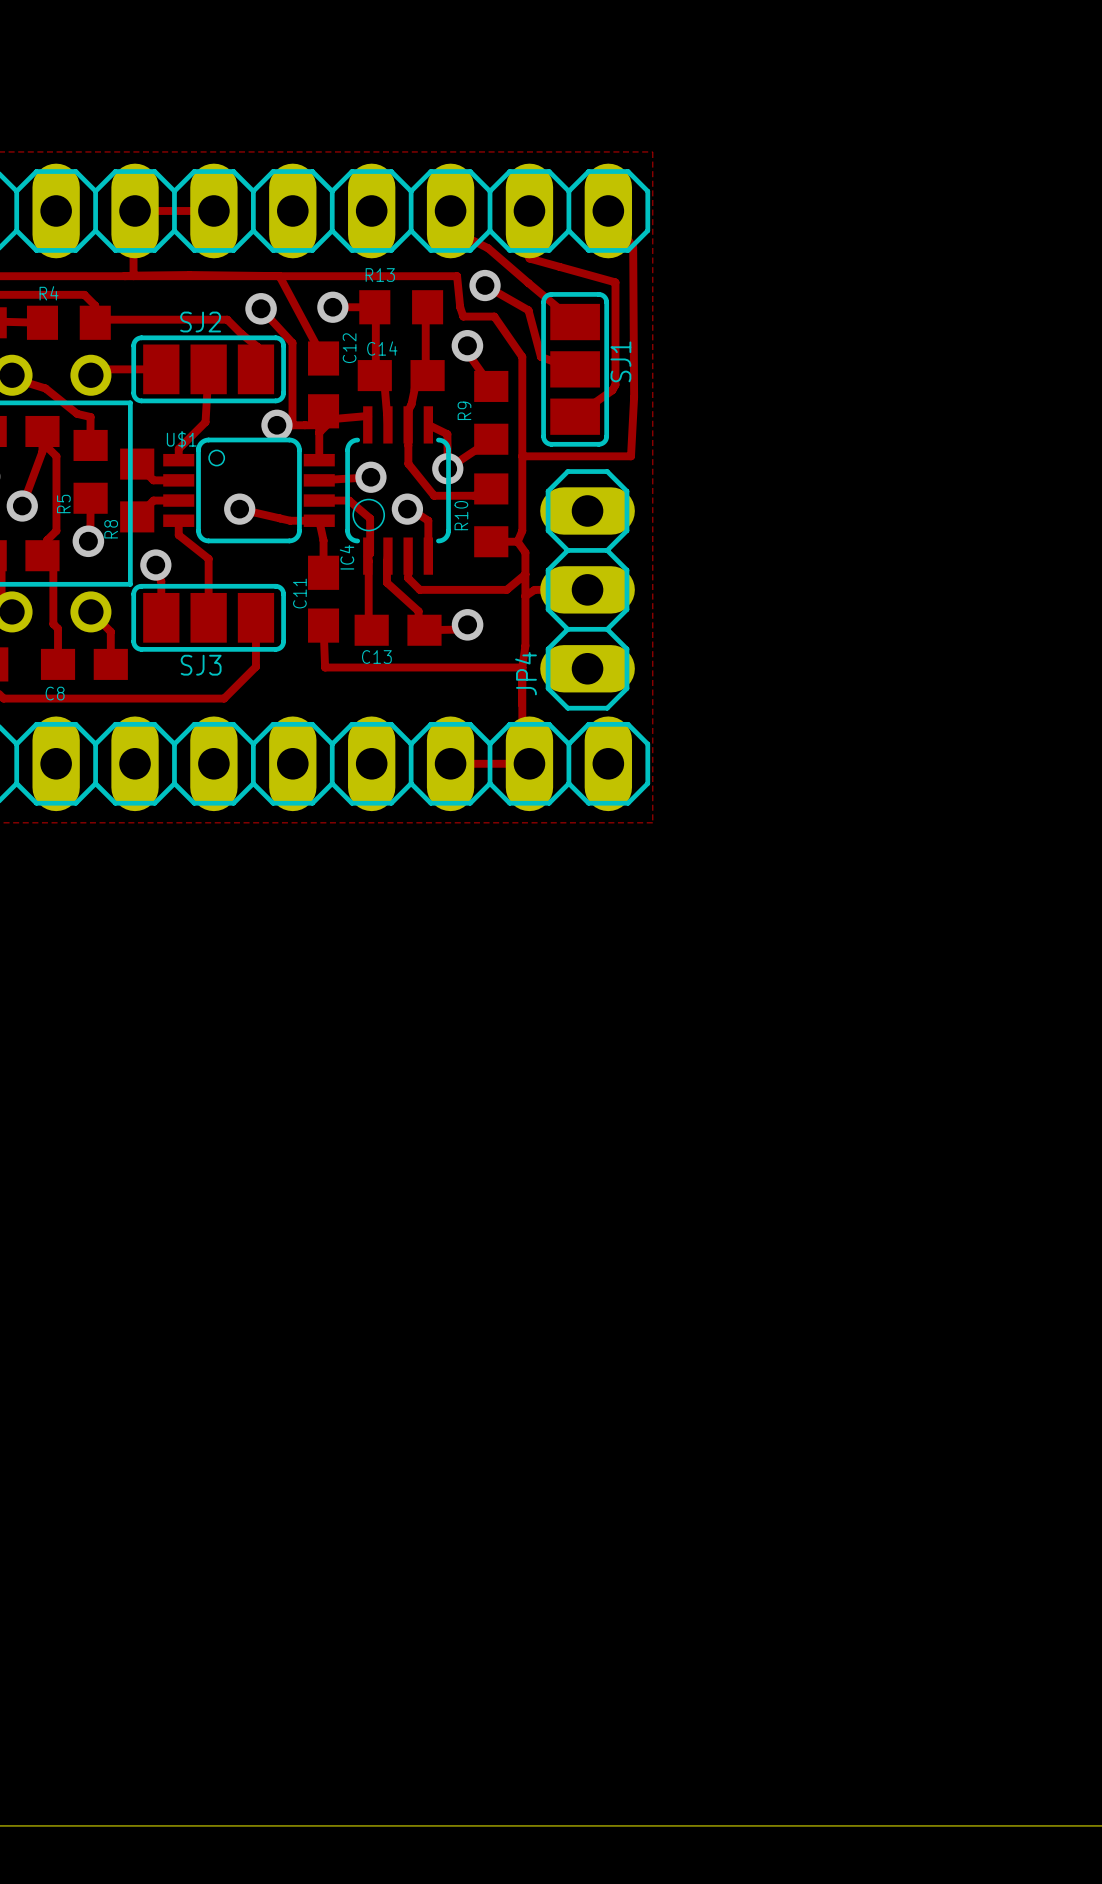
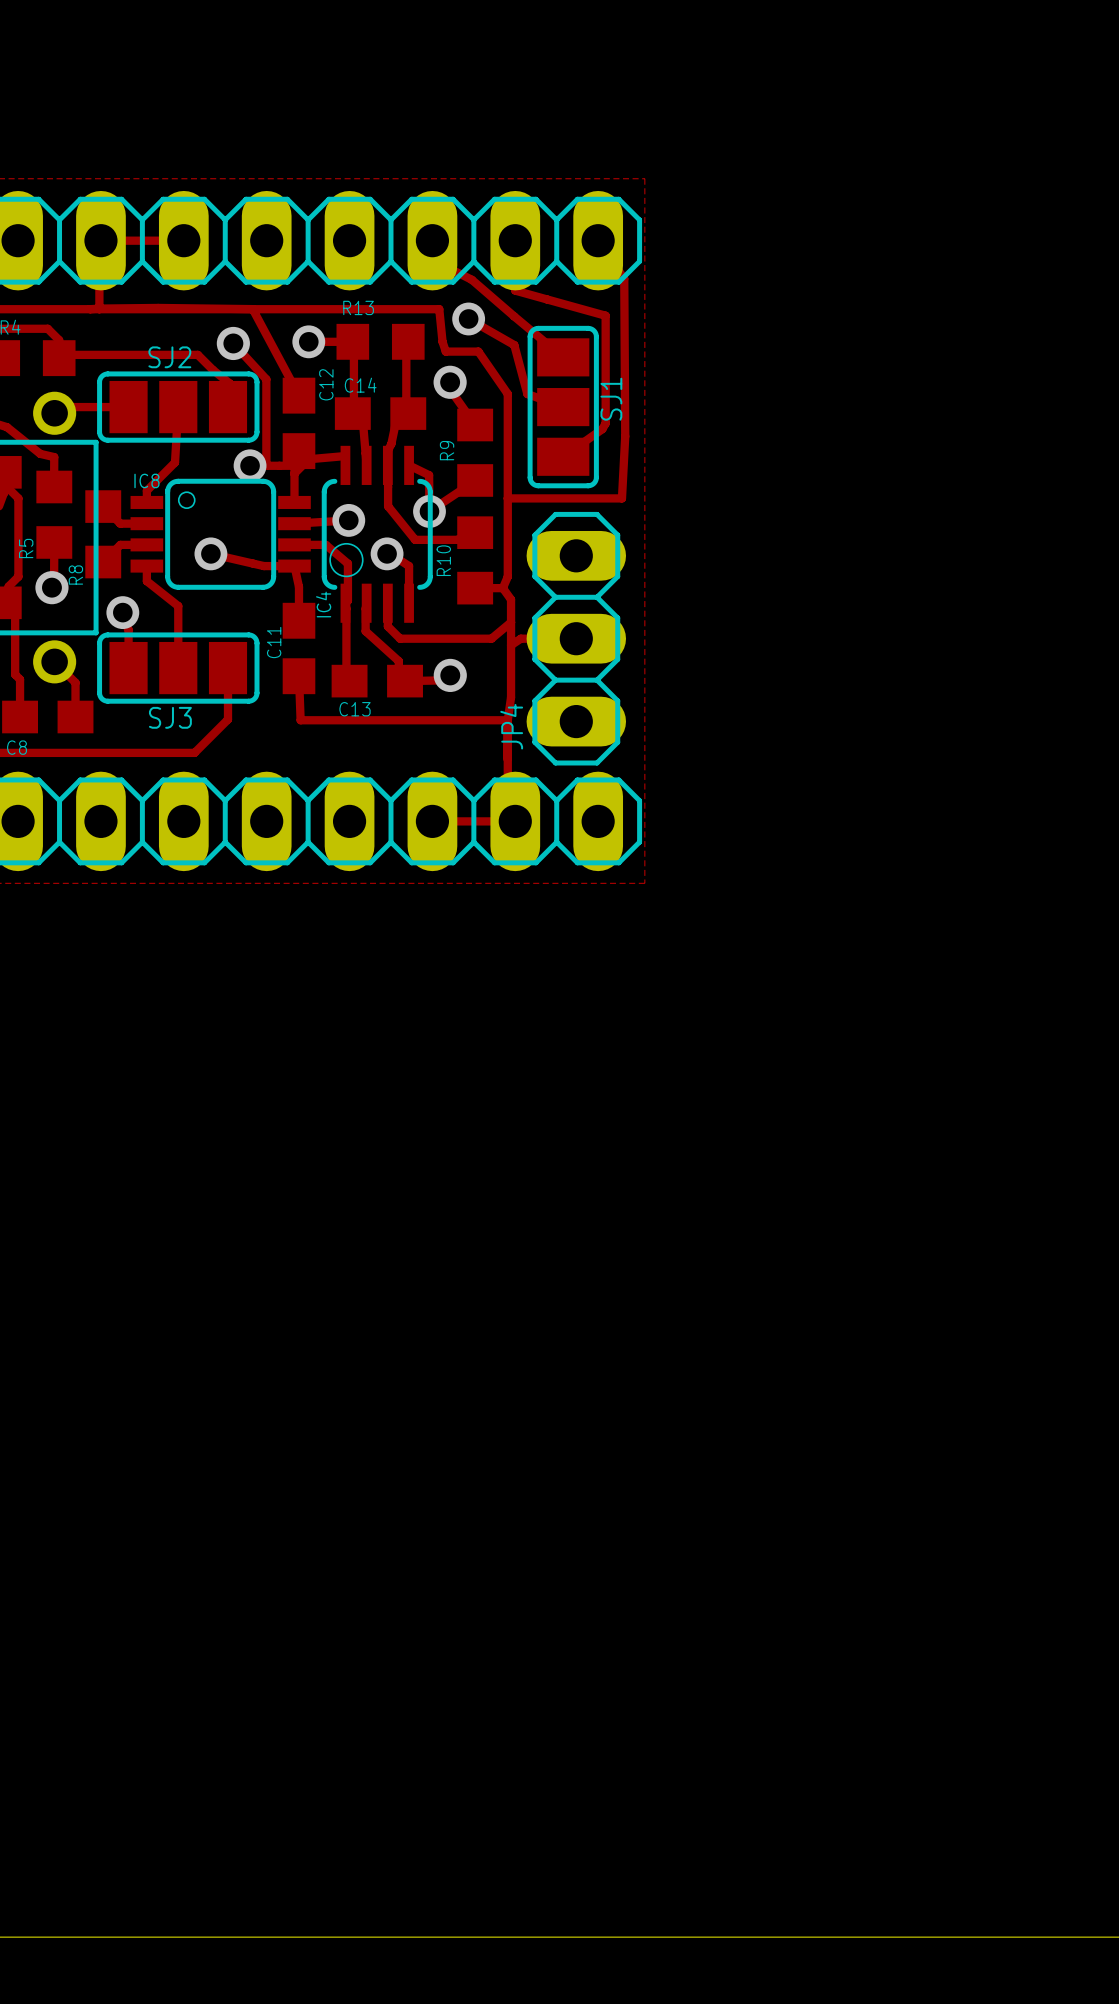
U$1 name: U$1 (181, 439) -> IC8 (146, 480)

